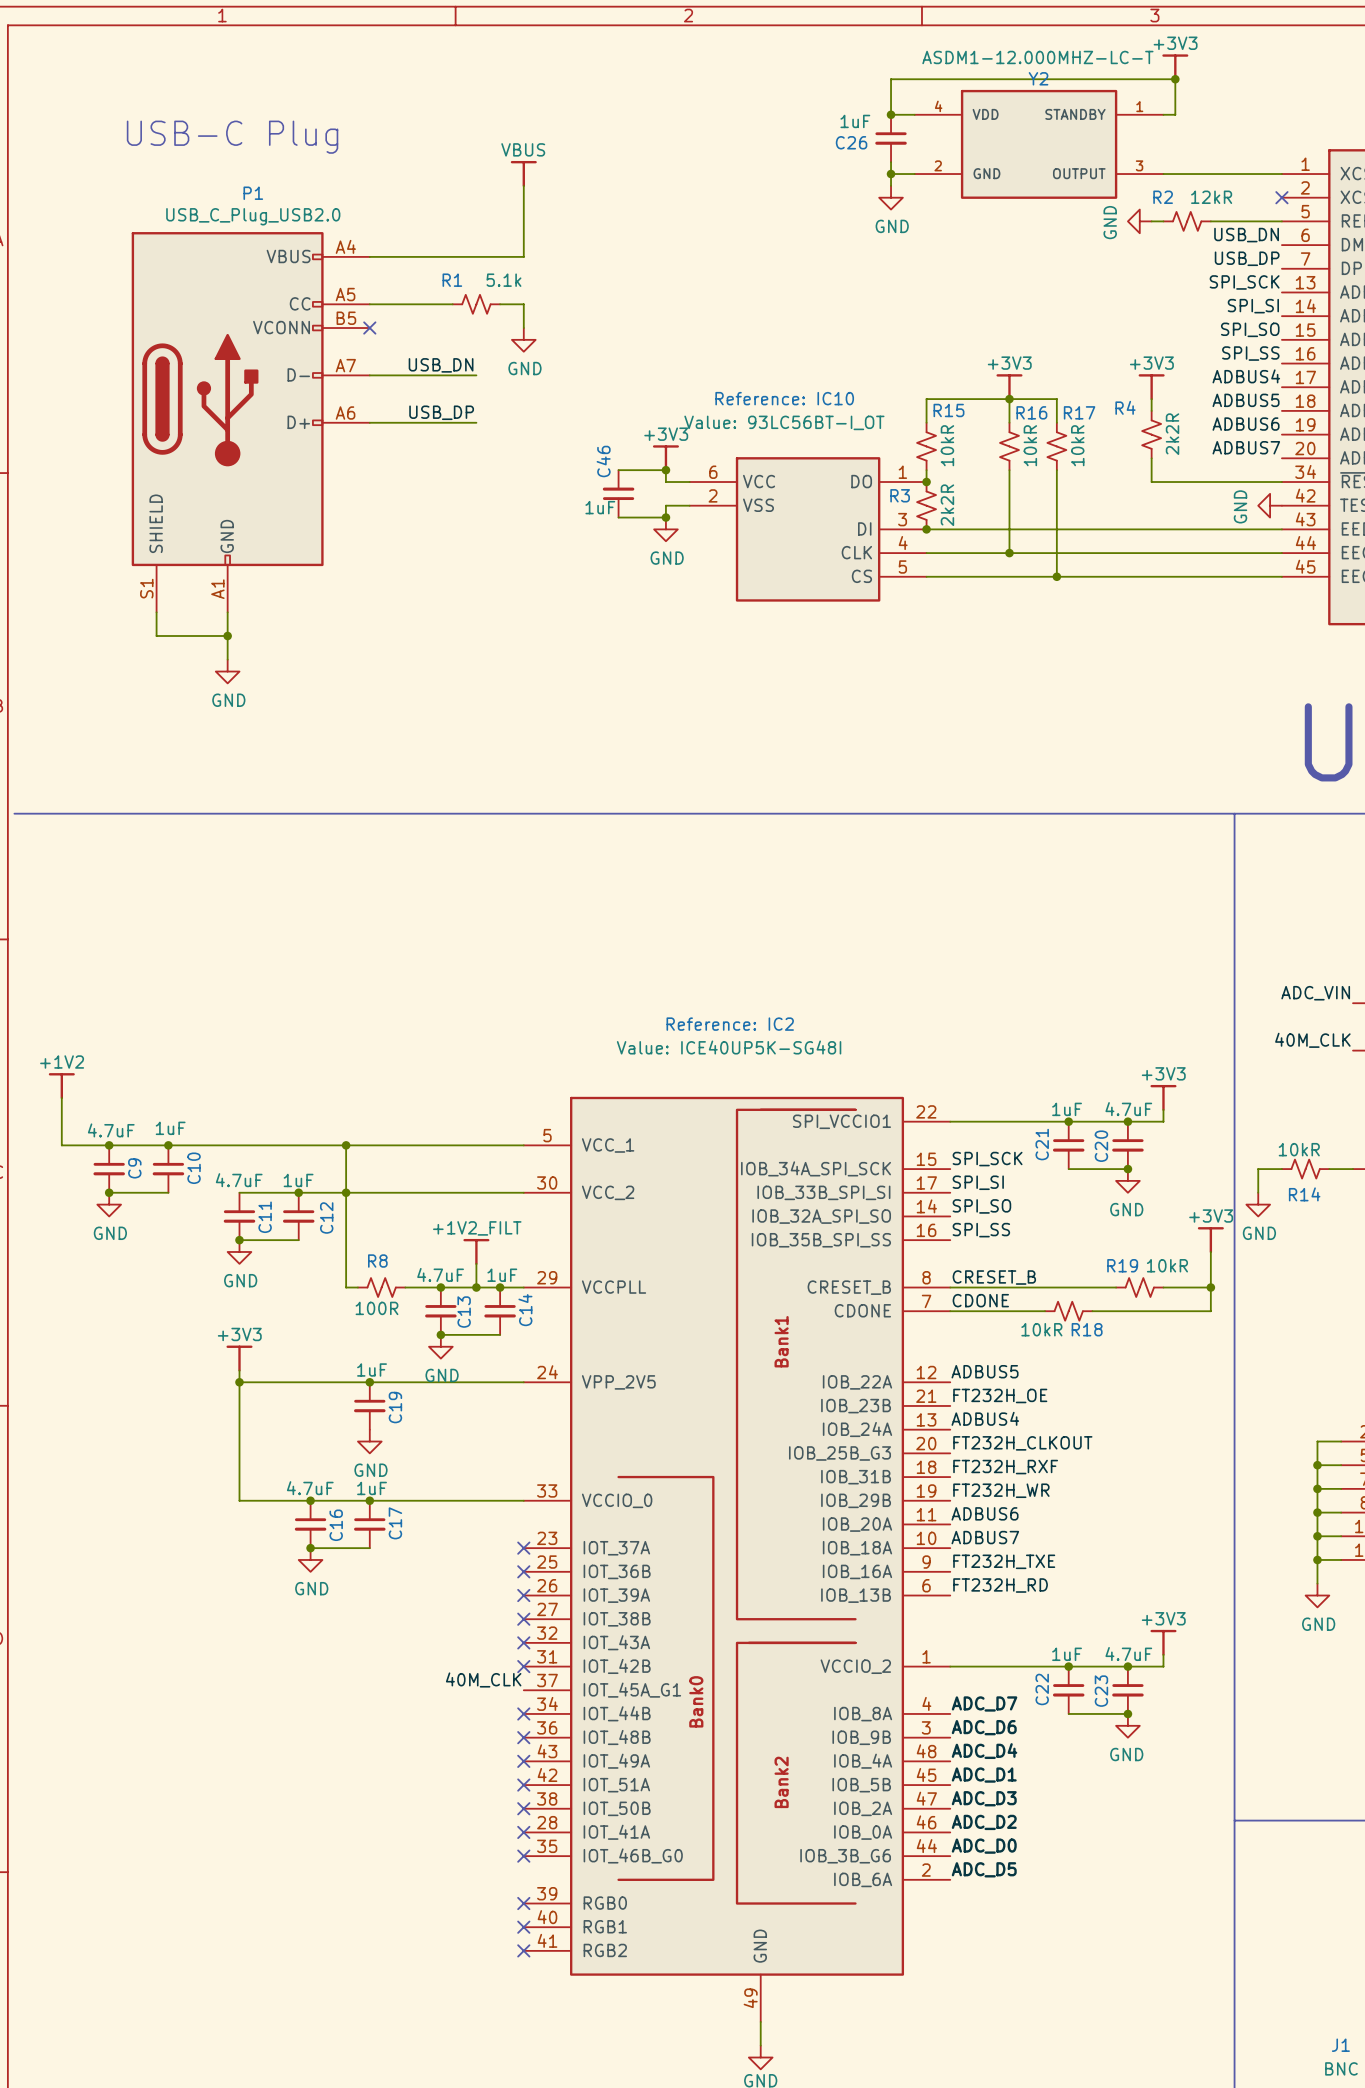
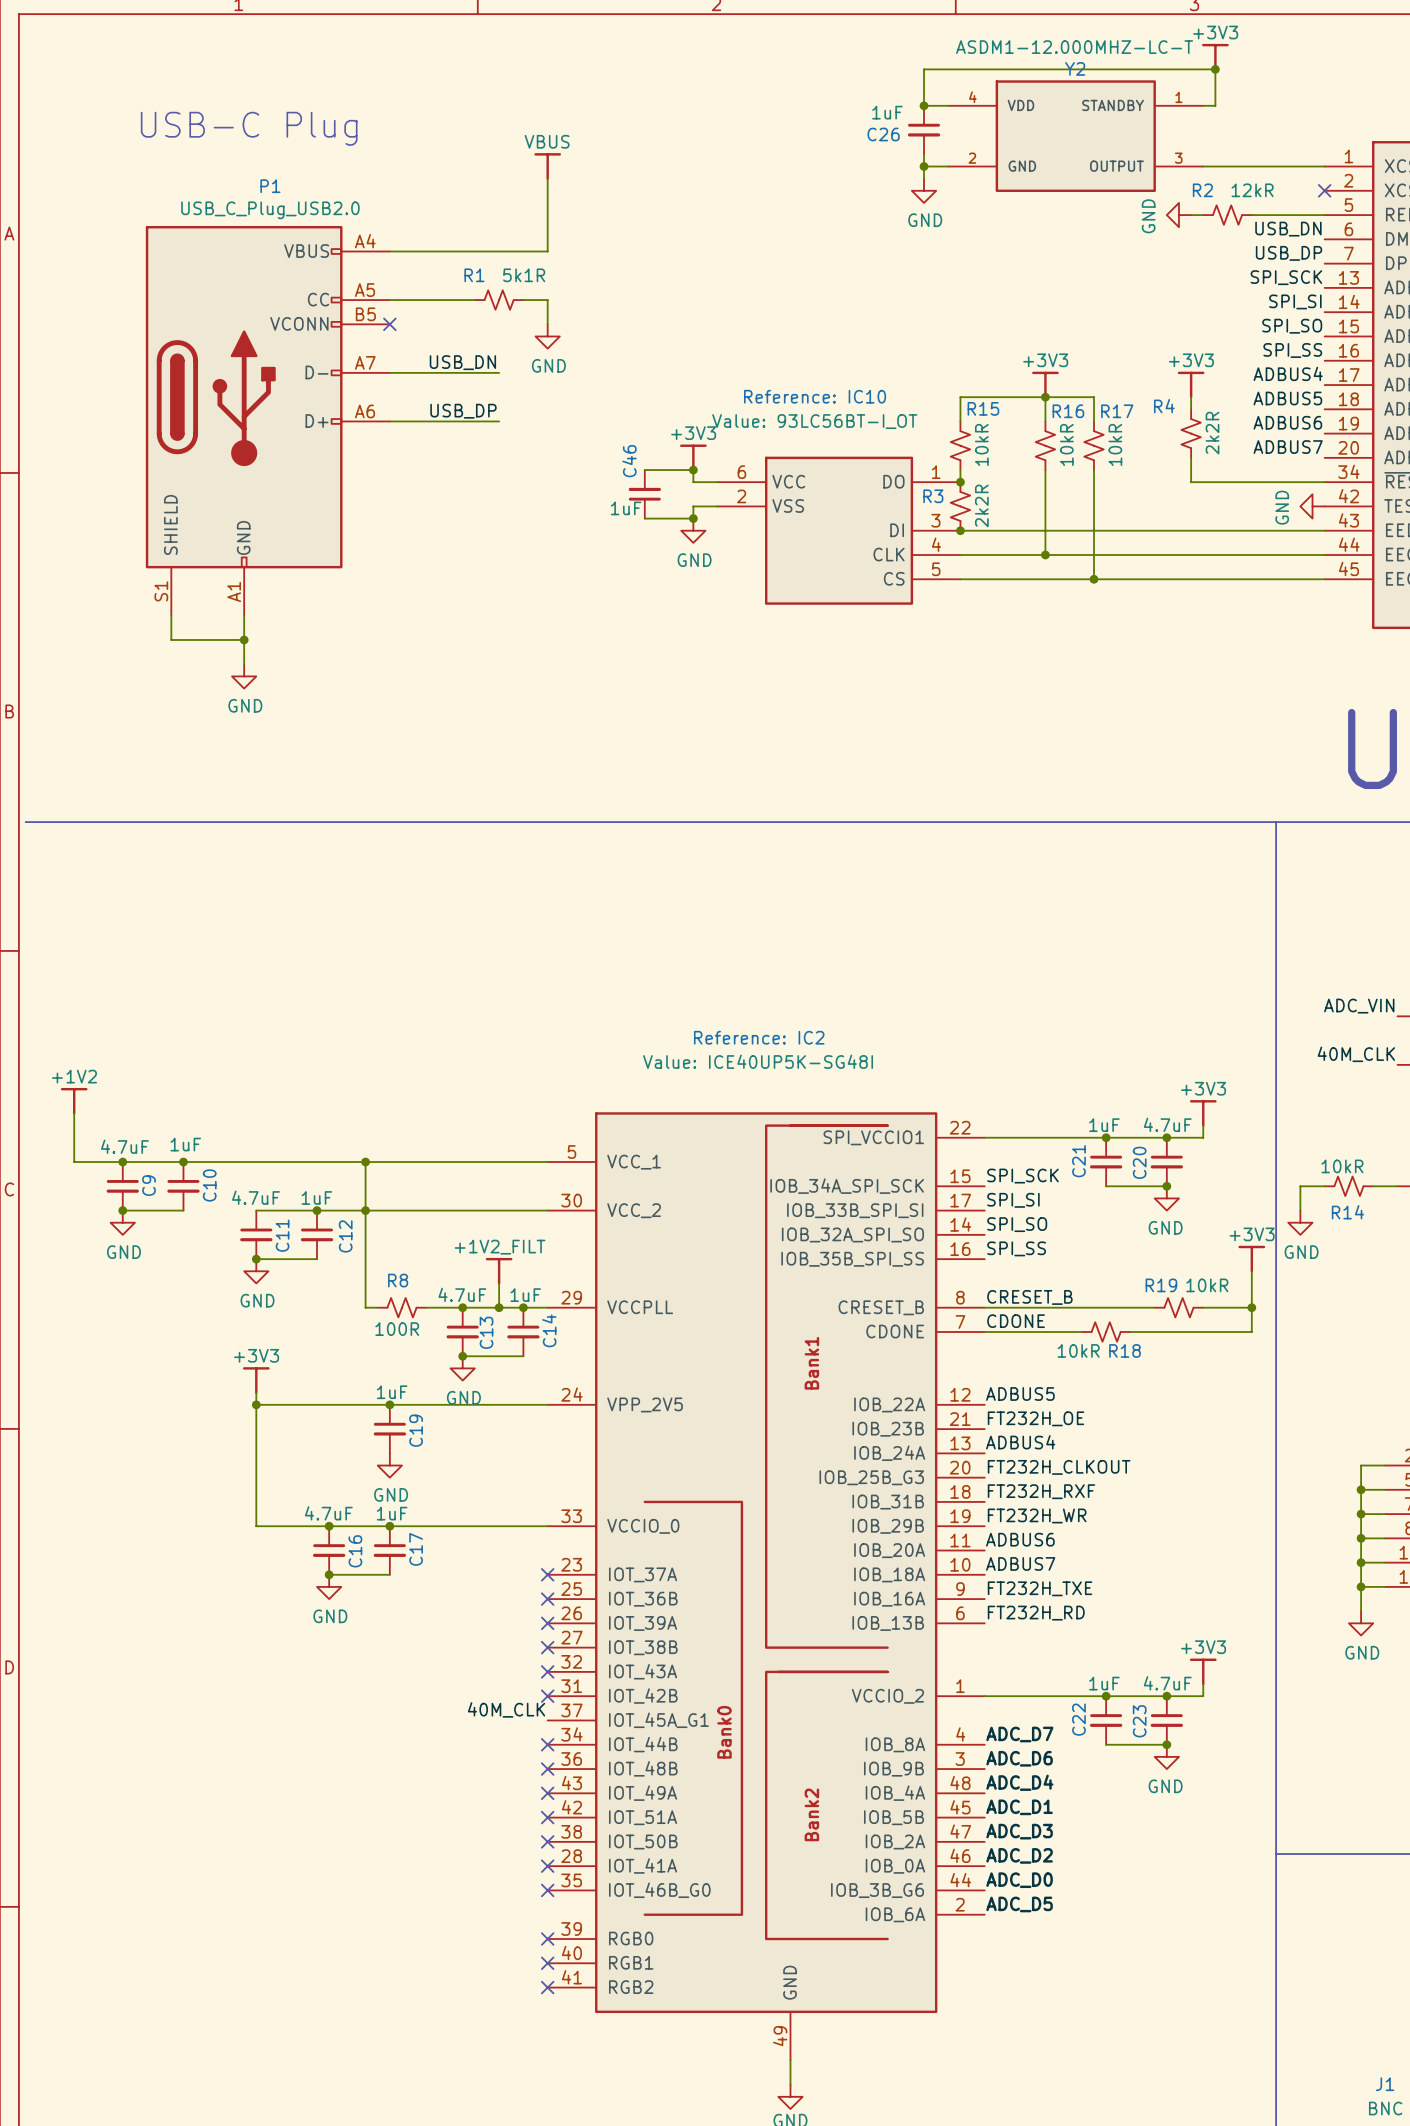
R1 value: 5.1k (503, 280) -> 5k1R (524, 275)

